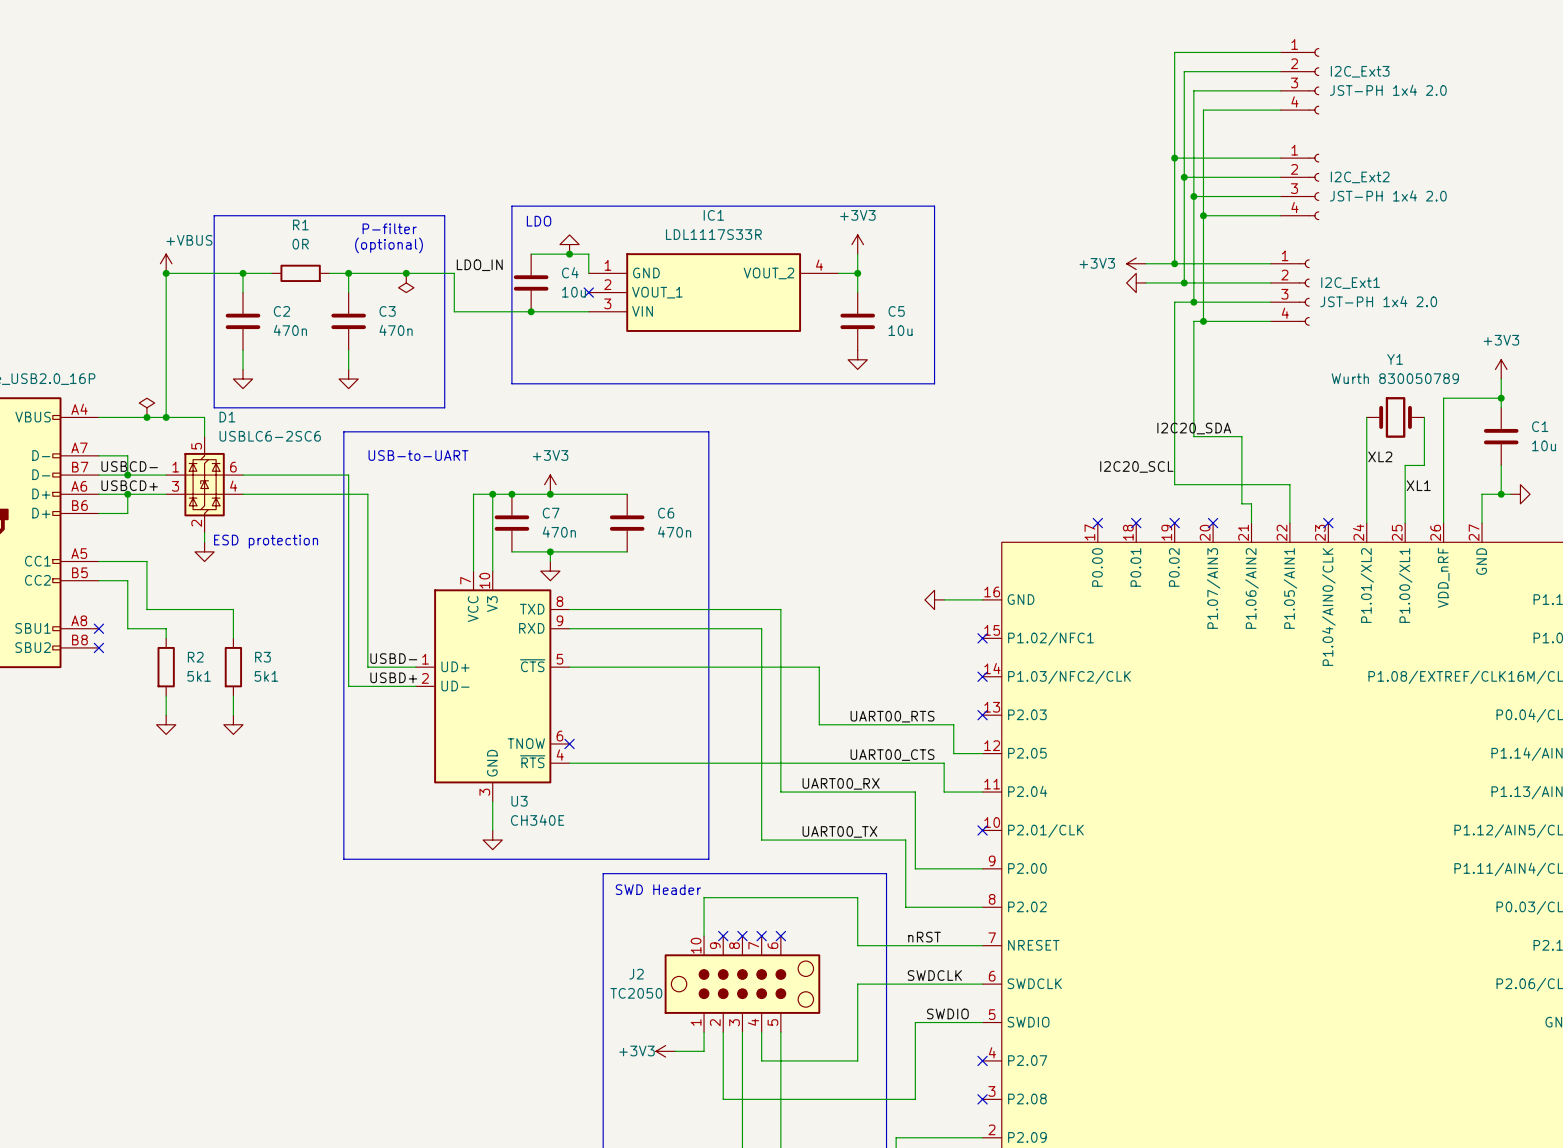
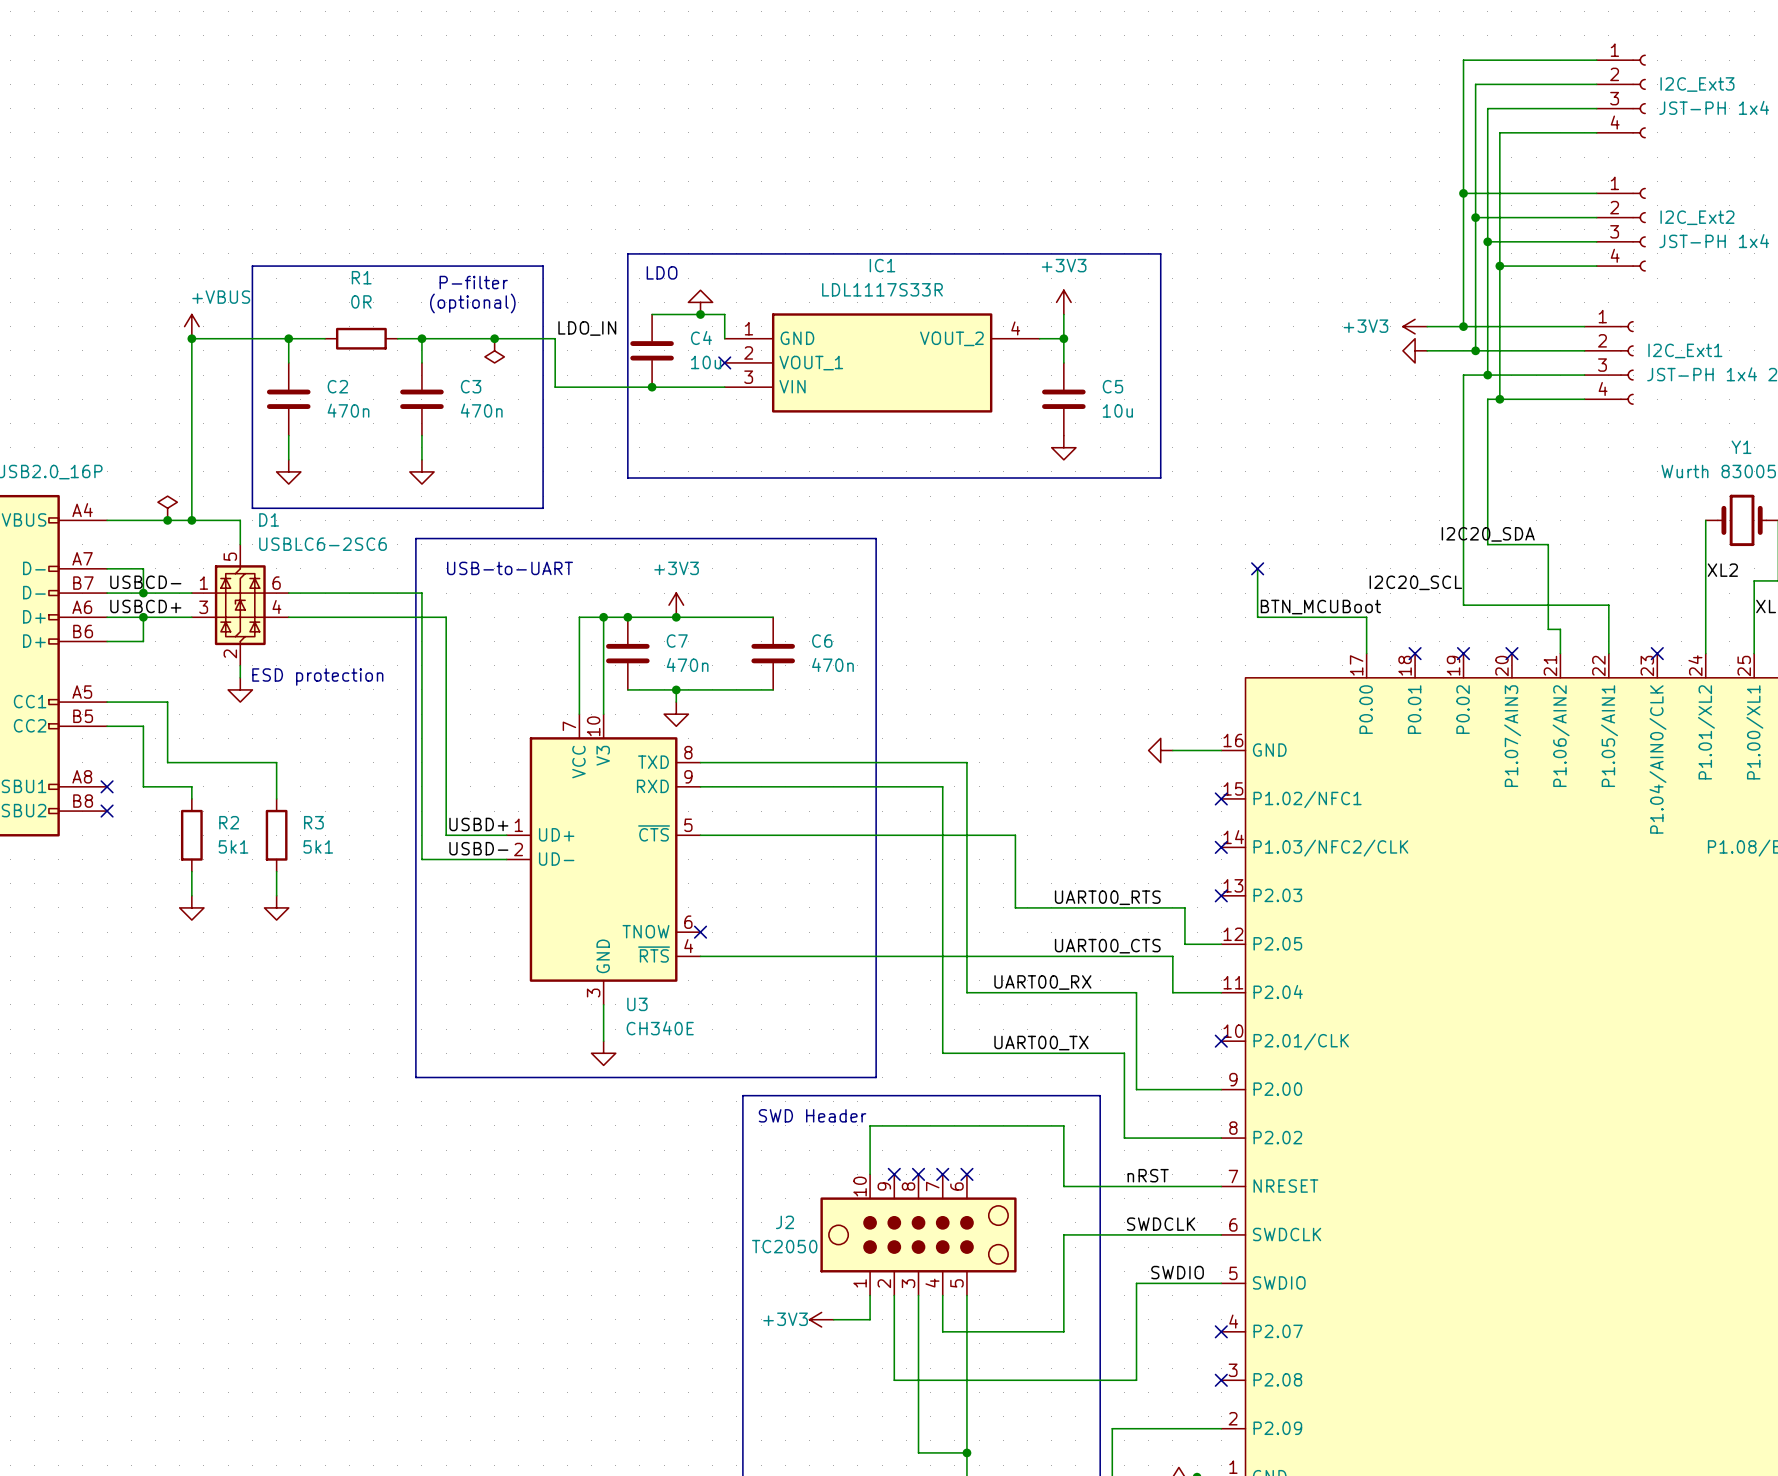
wire: none -> (1257, 568) (1257, 617) (1366, 617) (1366, 653)
no-connect mark: none -> (1257, 568)
label: none -> BTN_MCUBoot (1320, 607)
no-connect mark: (1097, 523) -> none
label: USBD- (393, 658) -> USBD+ (478, 824)
label: USBD+ (393, 677) -> USBD- (478, 848)

